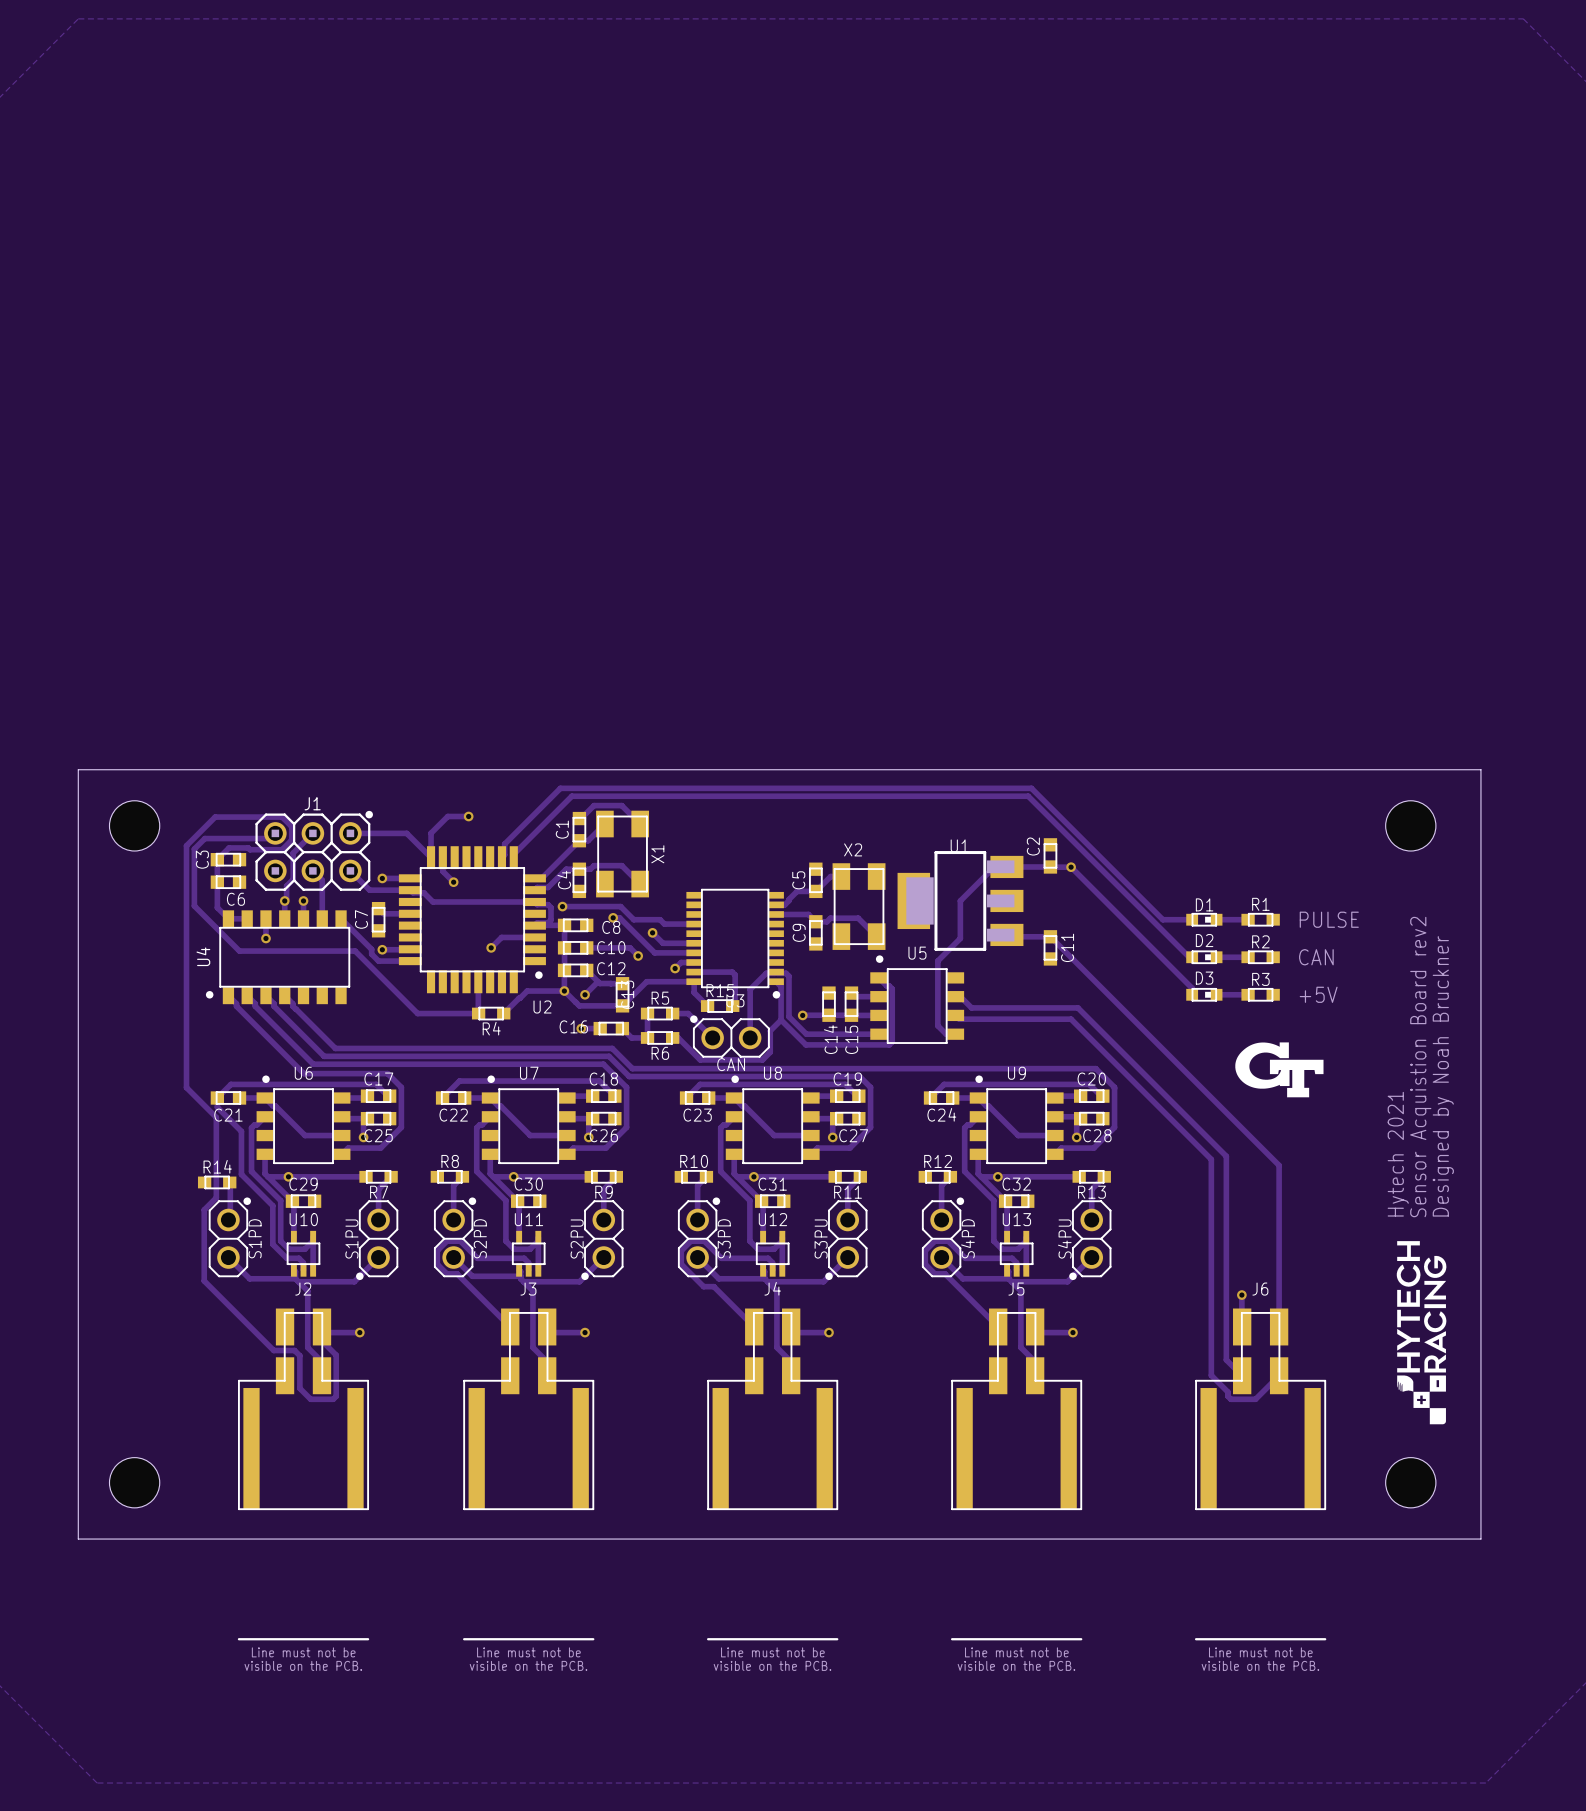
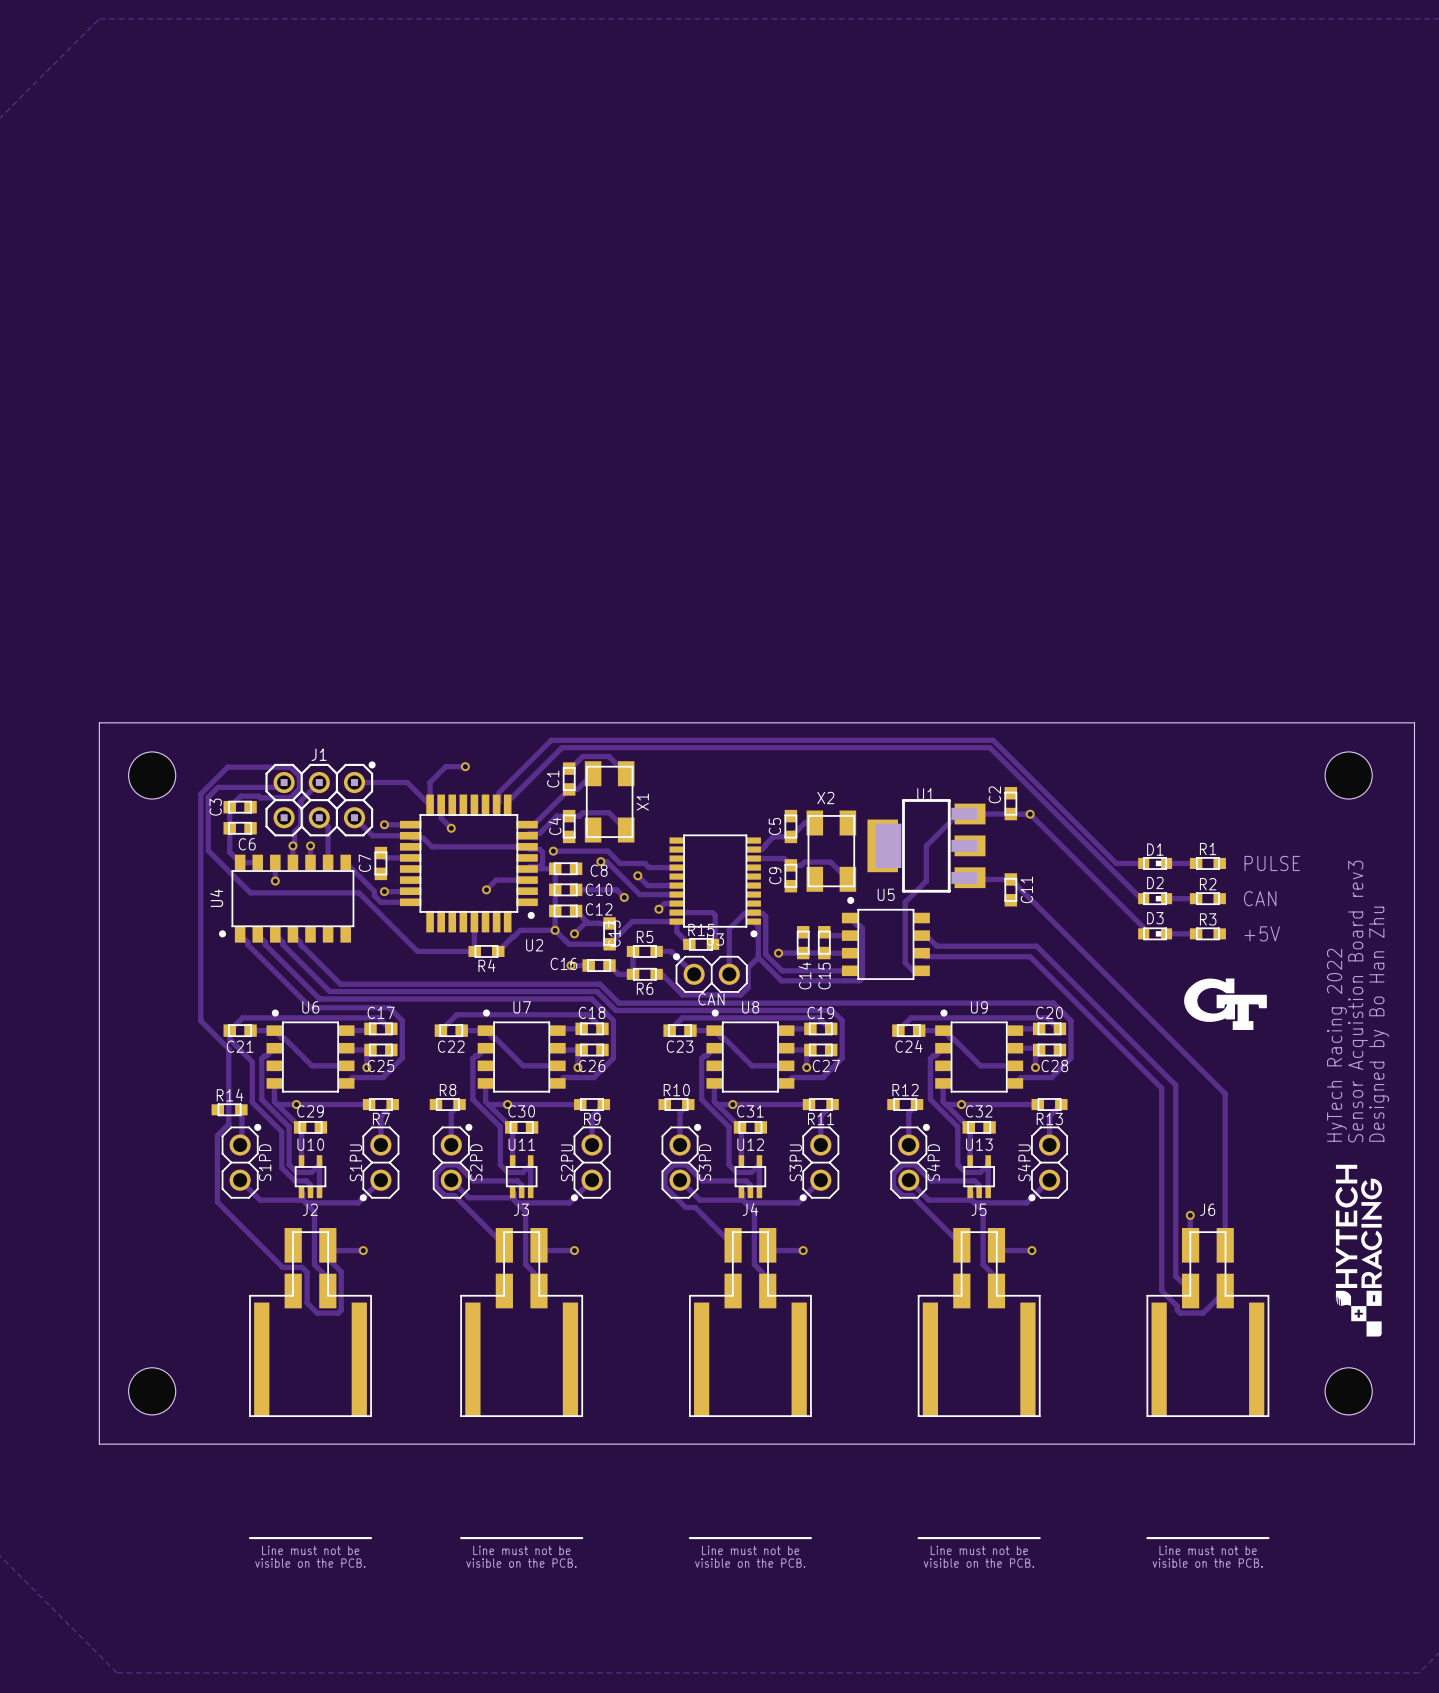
text: Sensor Acquistion Board rev2 (1420, 1067) -> Sensor Acquistion Board rev3 (1358, 1001)
text: Designed by Noah Bruckner (1443, 1076) -> Designed by Bo Han Zhu (1379, 1024)
text: Hytech 2021 (1398, 1154) -> HyTech Racing 2022 (1336, 1045)

